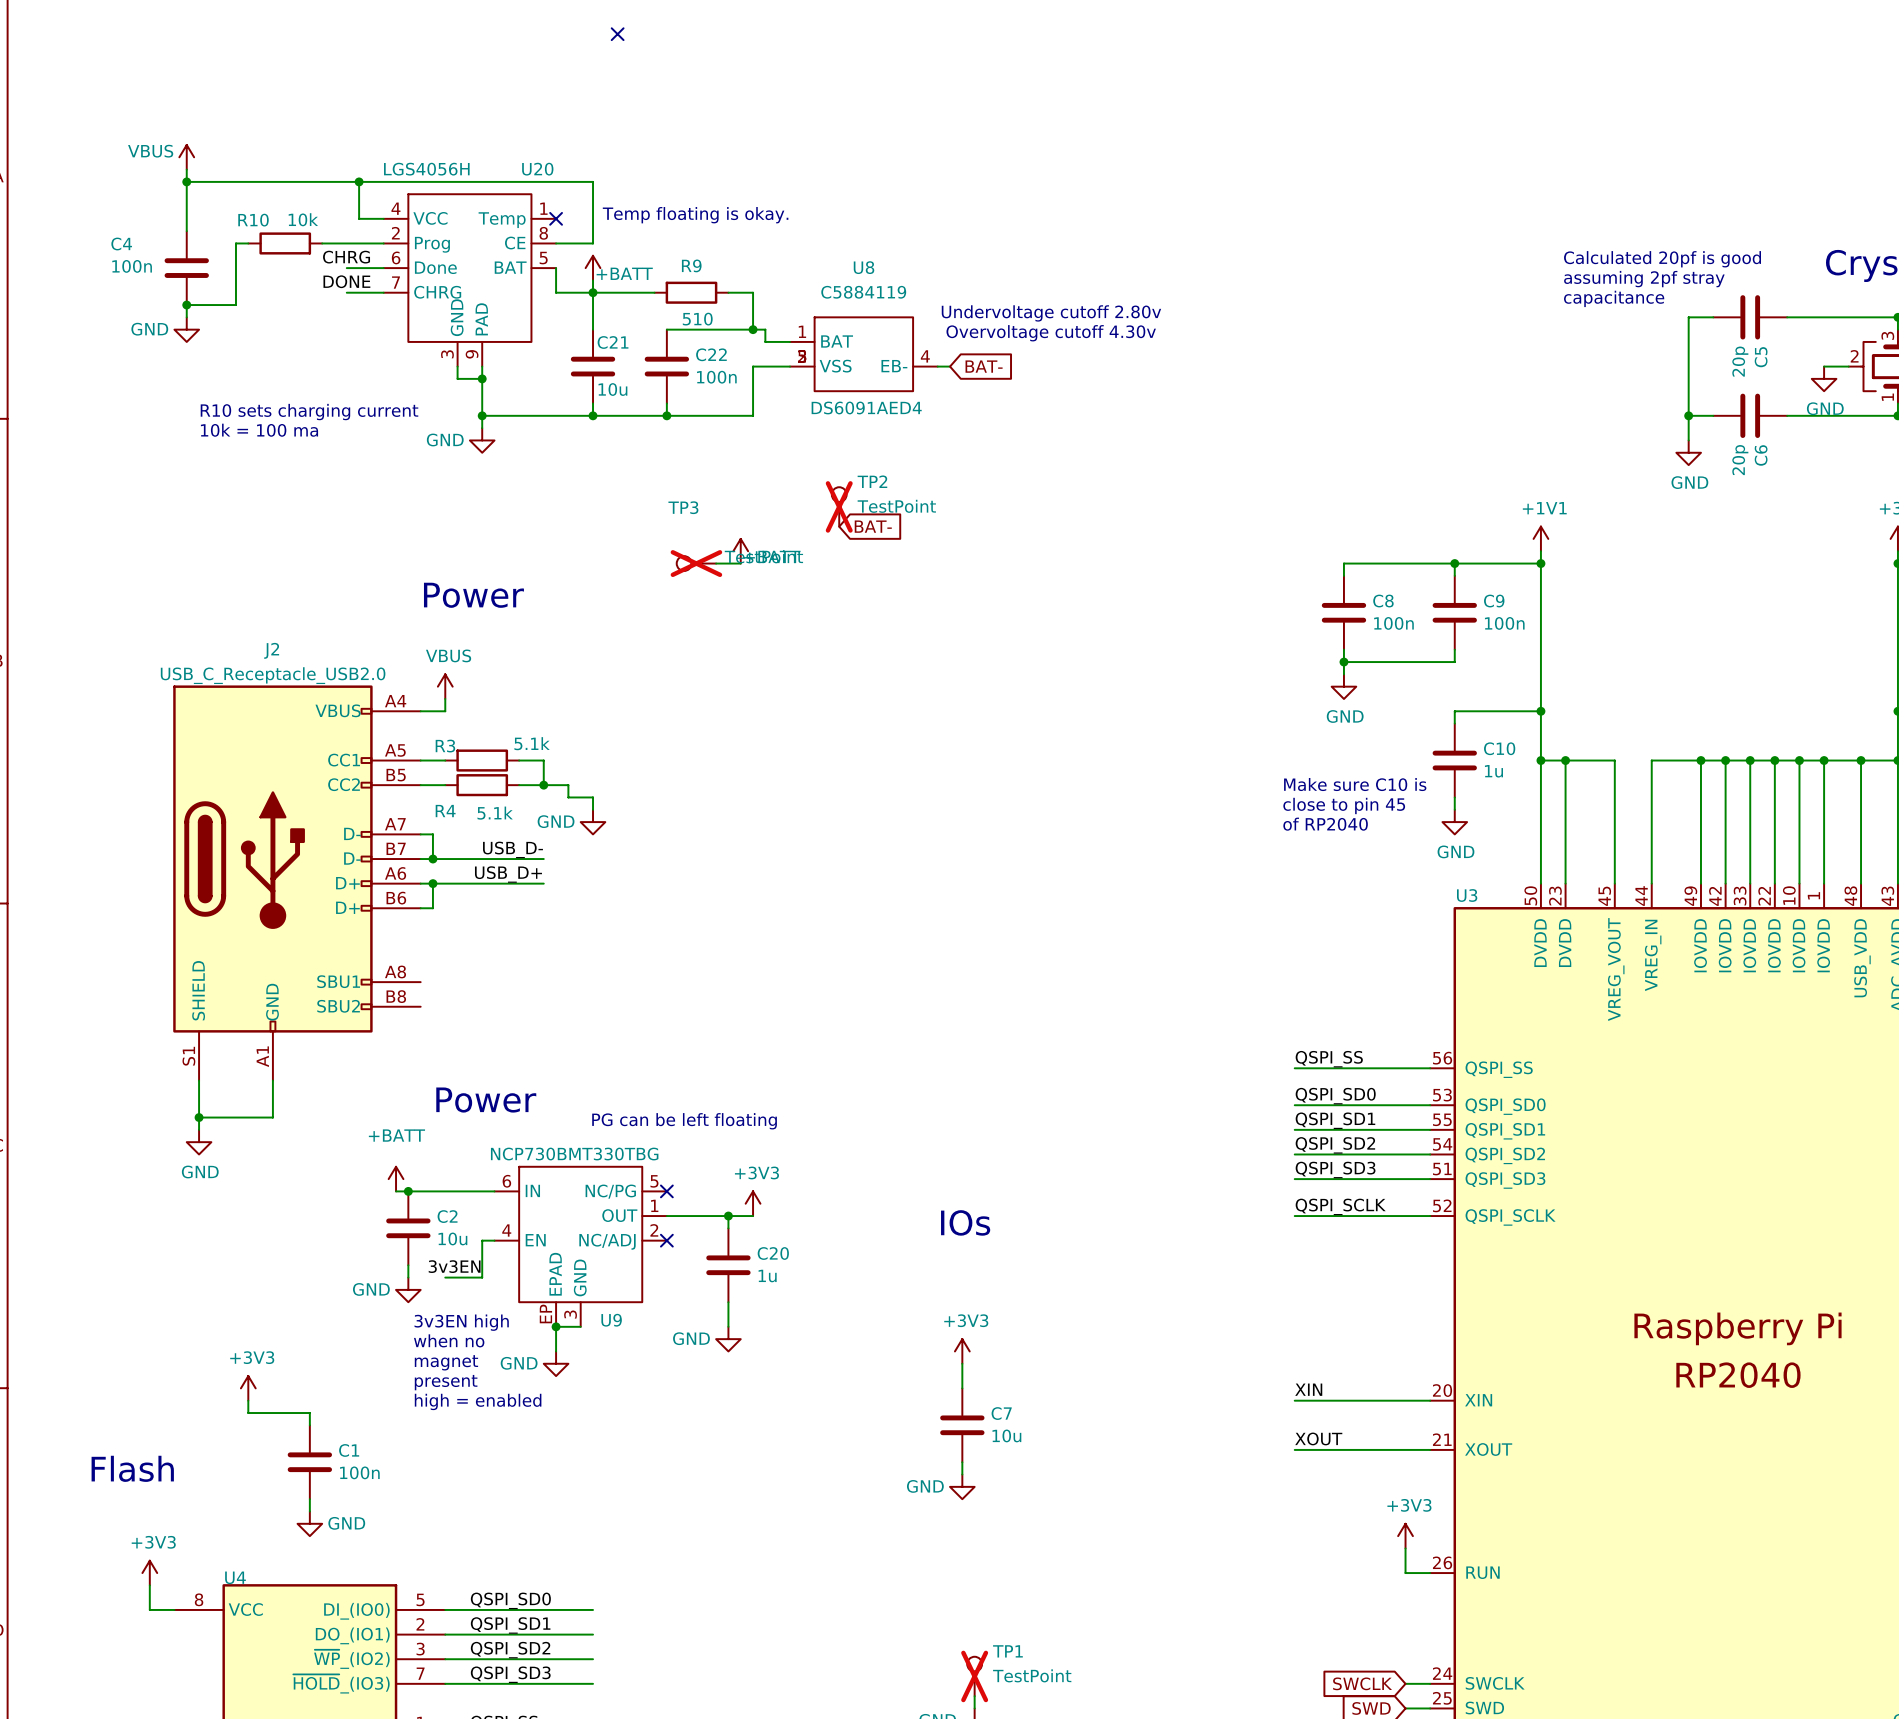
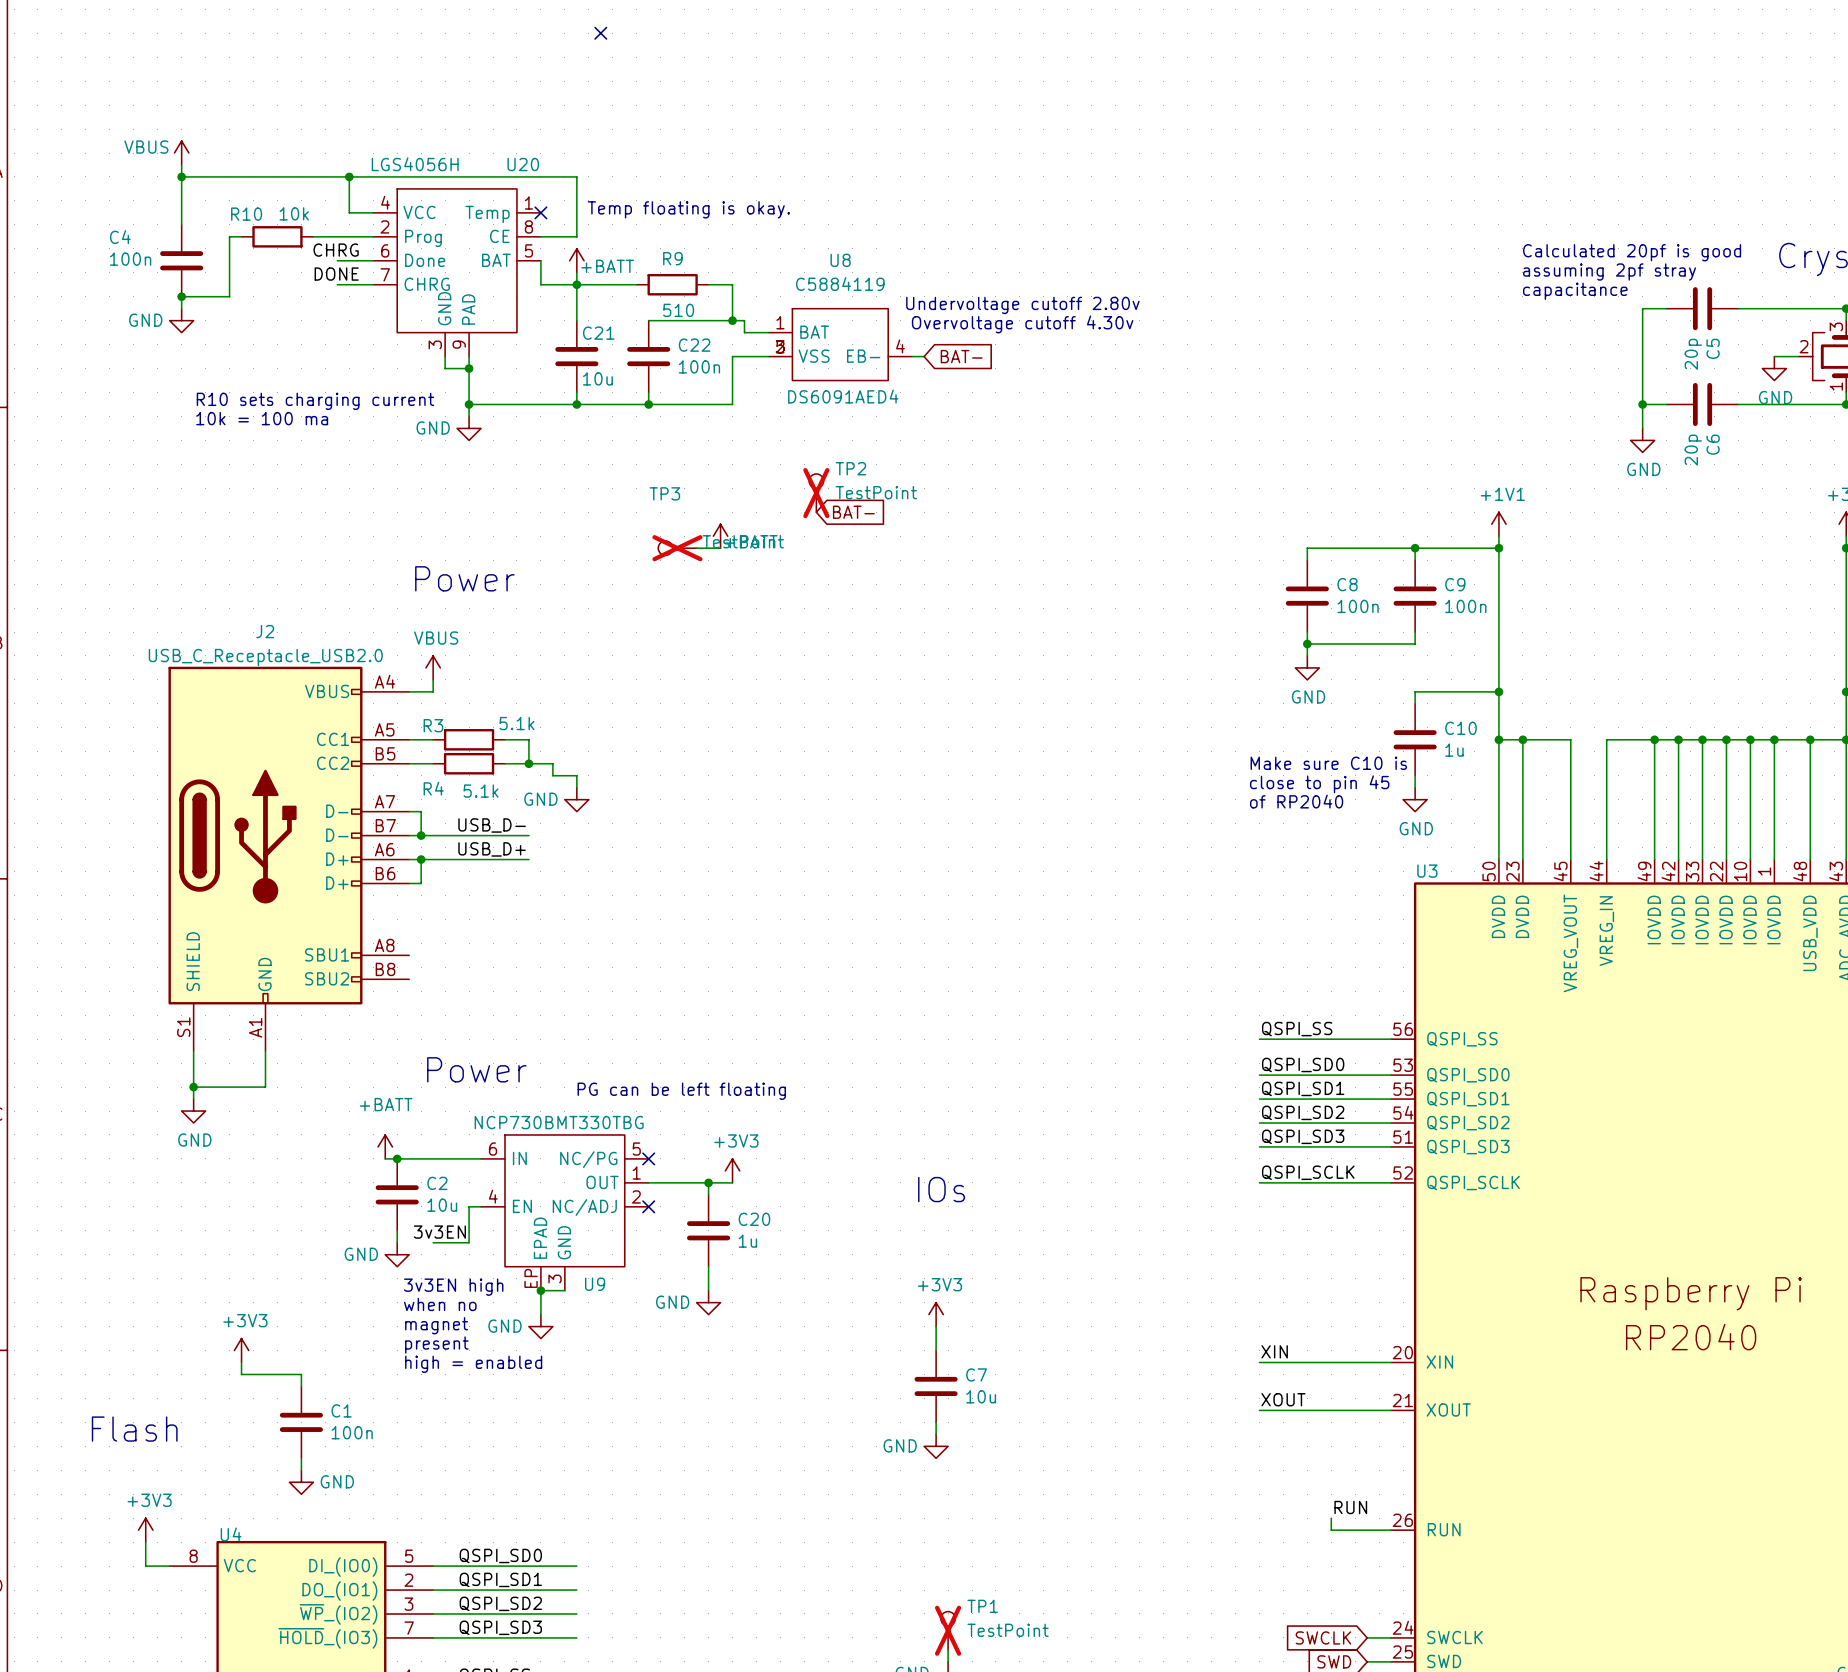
power symbol: +3V3 (1405, 1536) -> none
wire: (1405, 1548) (1405, 1573) -> (1331, 1518) (1331, 1530) (1367, 1530)
label: none -> RUN (1350, 1507)

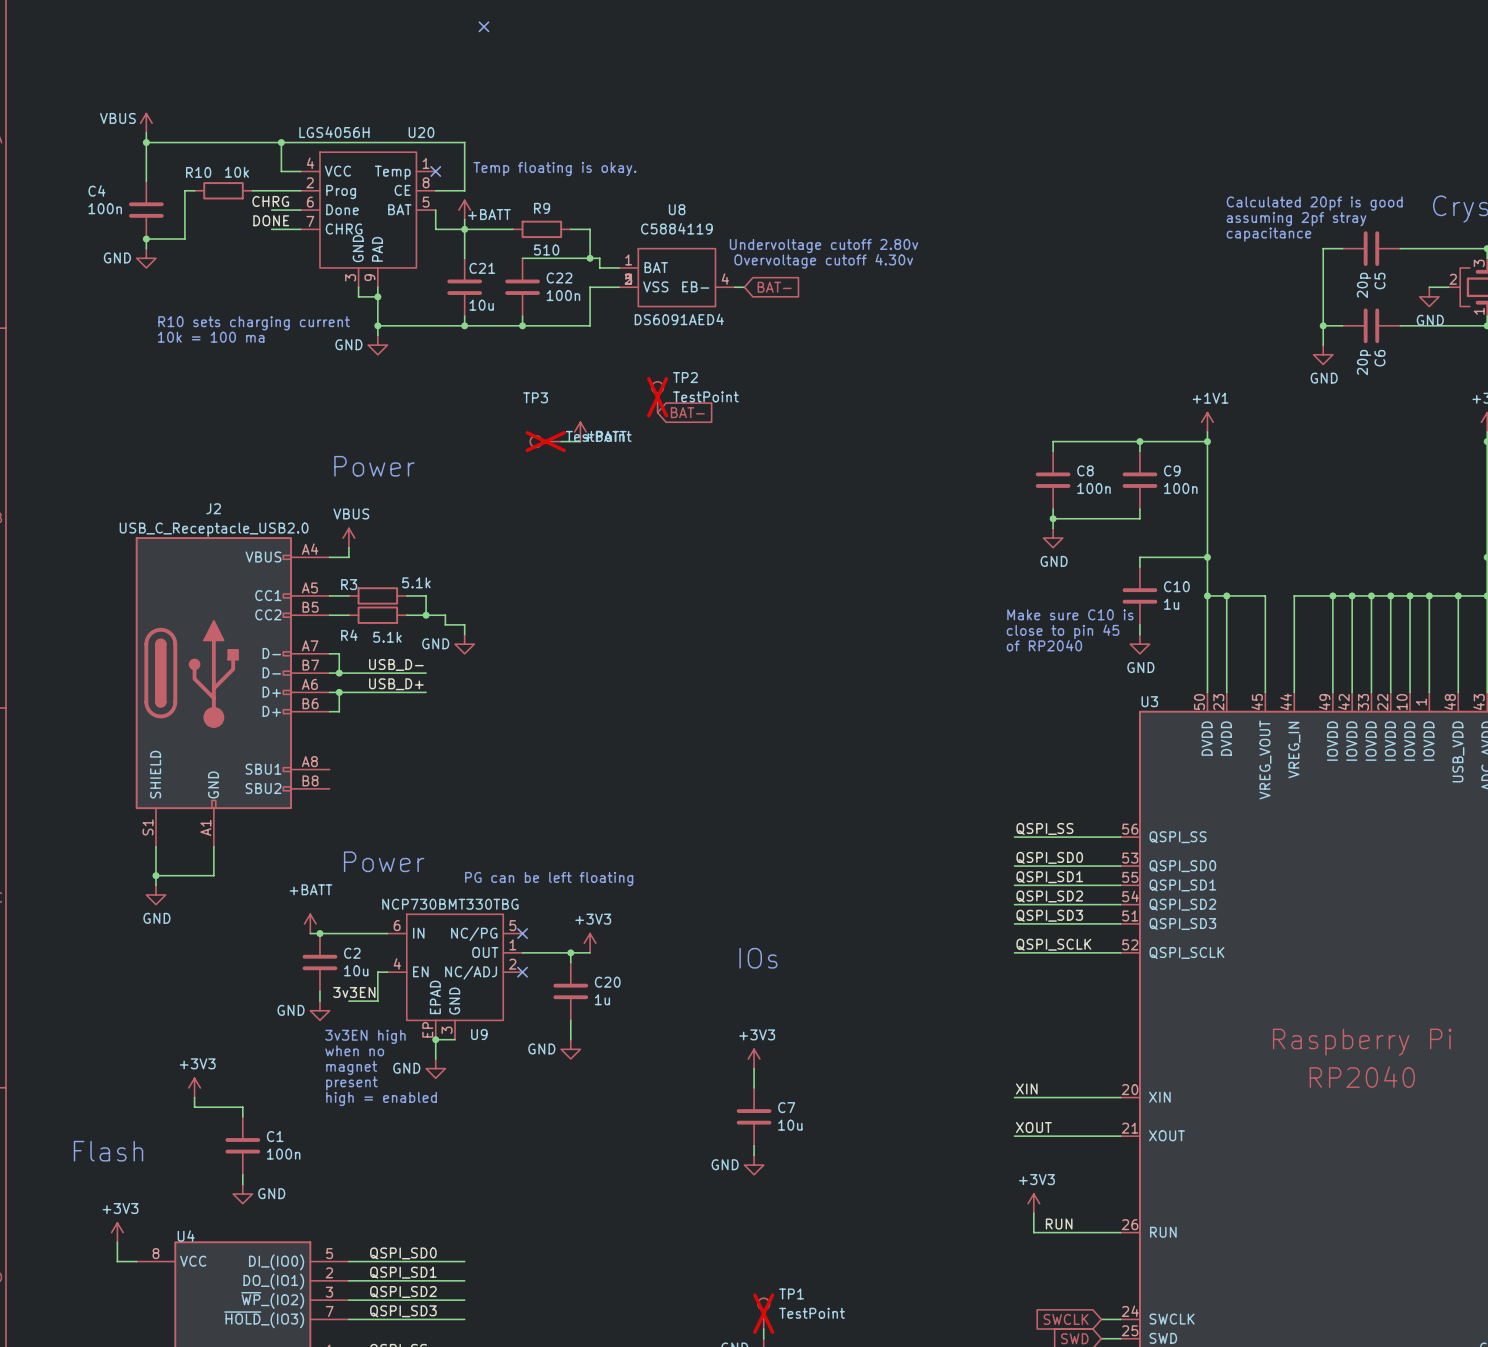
power symbol: none -> +3V3 (1033, 1203)
label position: RUN (1350, 1507) -> RUN (1059, 1224)
wire: (1331, 1518) (1331, 1530) -> (1033, 1213) (1033, 1232) (1072, 1232)

